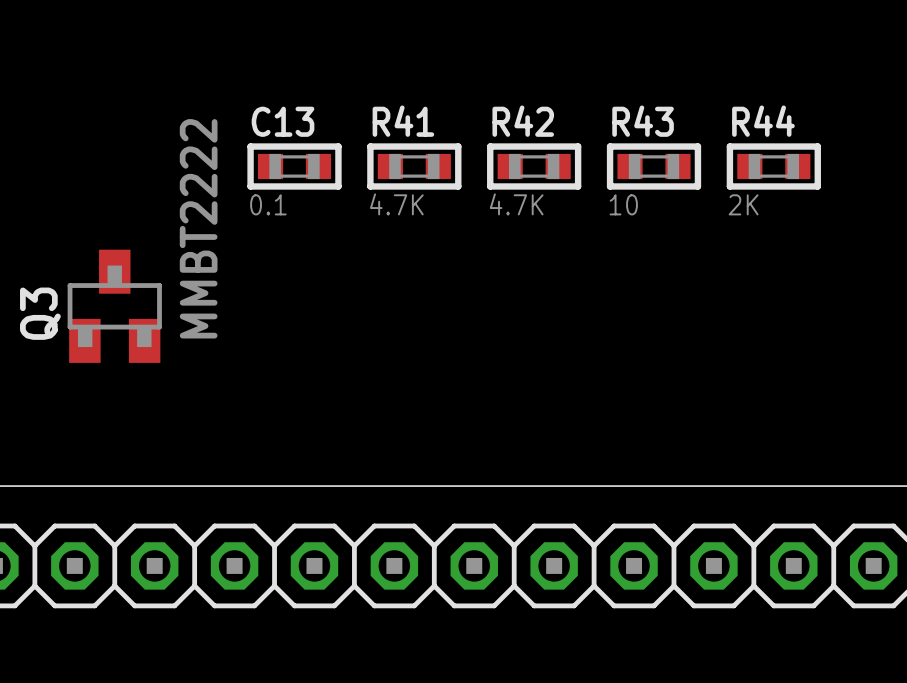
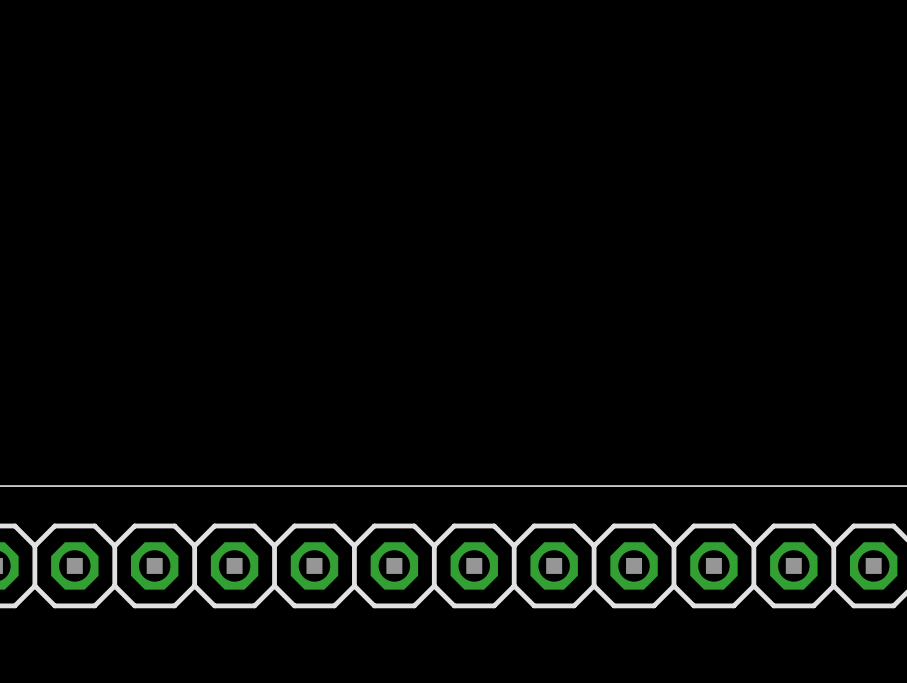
C13: 0.1 (294, 166) -> none
R41: 4.7K (414, 166) -> none
R42: 4.7K (534, 166) -> none
R43: 10 (654, 166) -> none
R44: 2K (773, 166) -> none
Q3: MMBT2222 (114, 306) -> none

